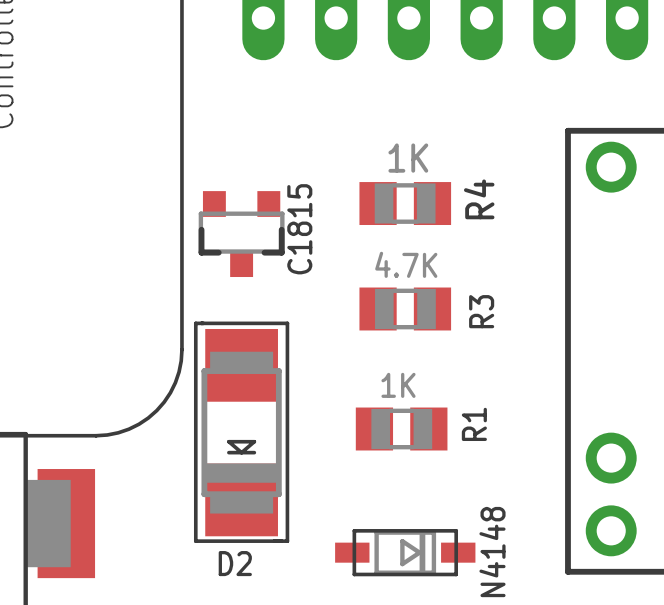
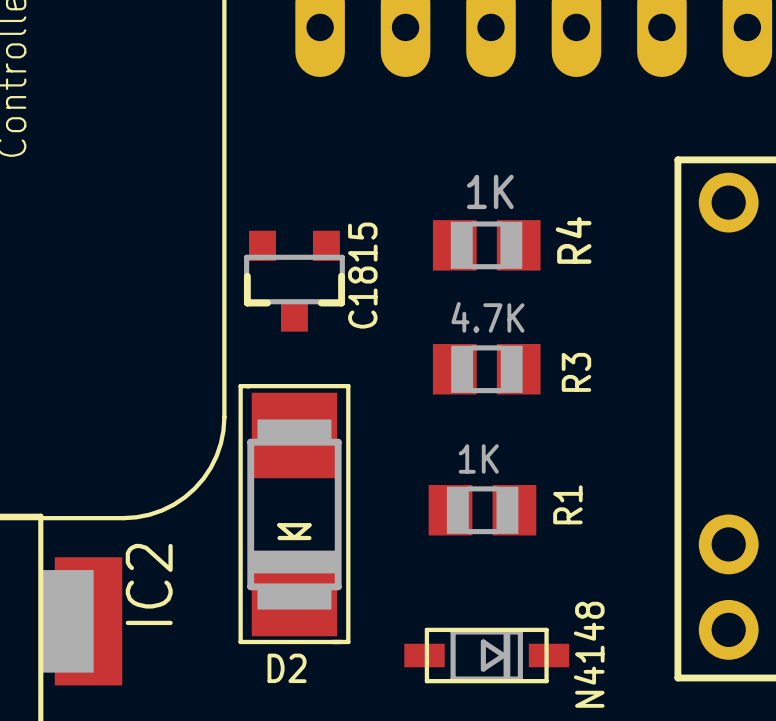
IC2 name: none -> IC2 (149, 584)

